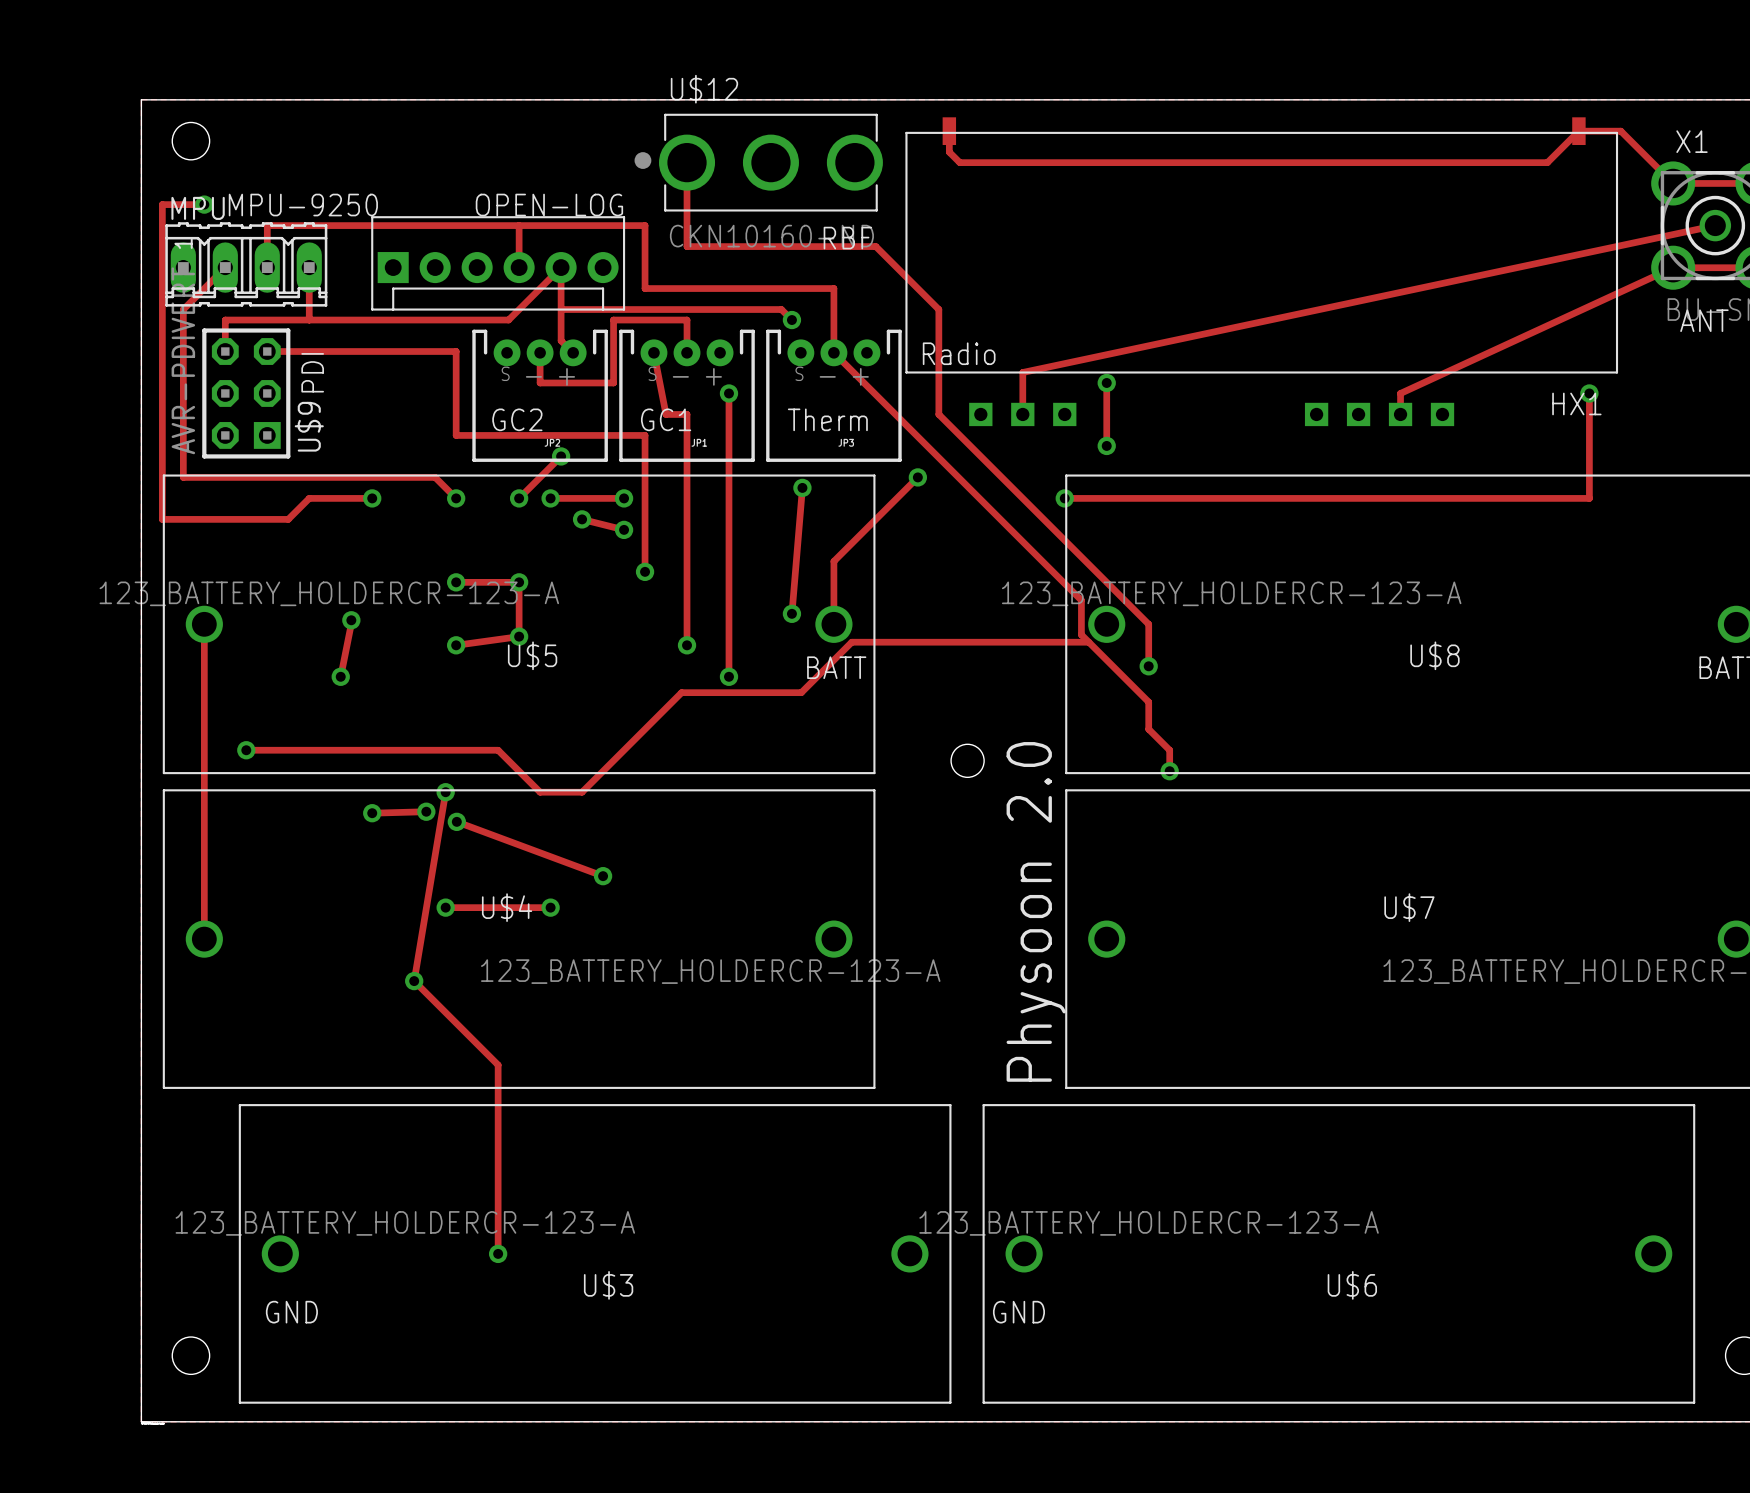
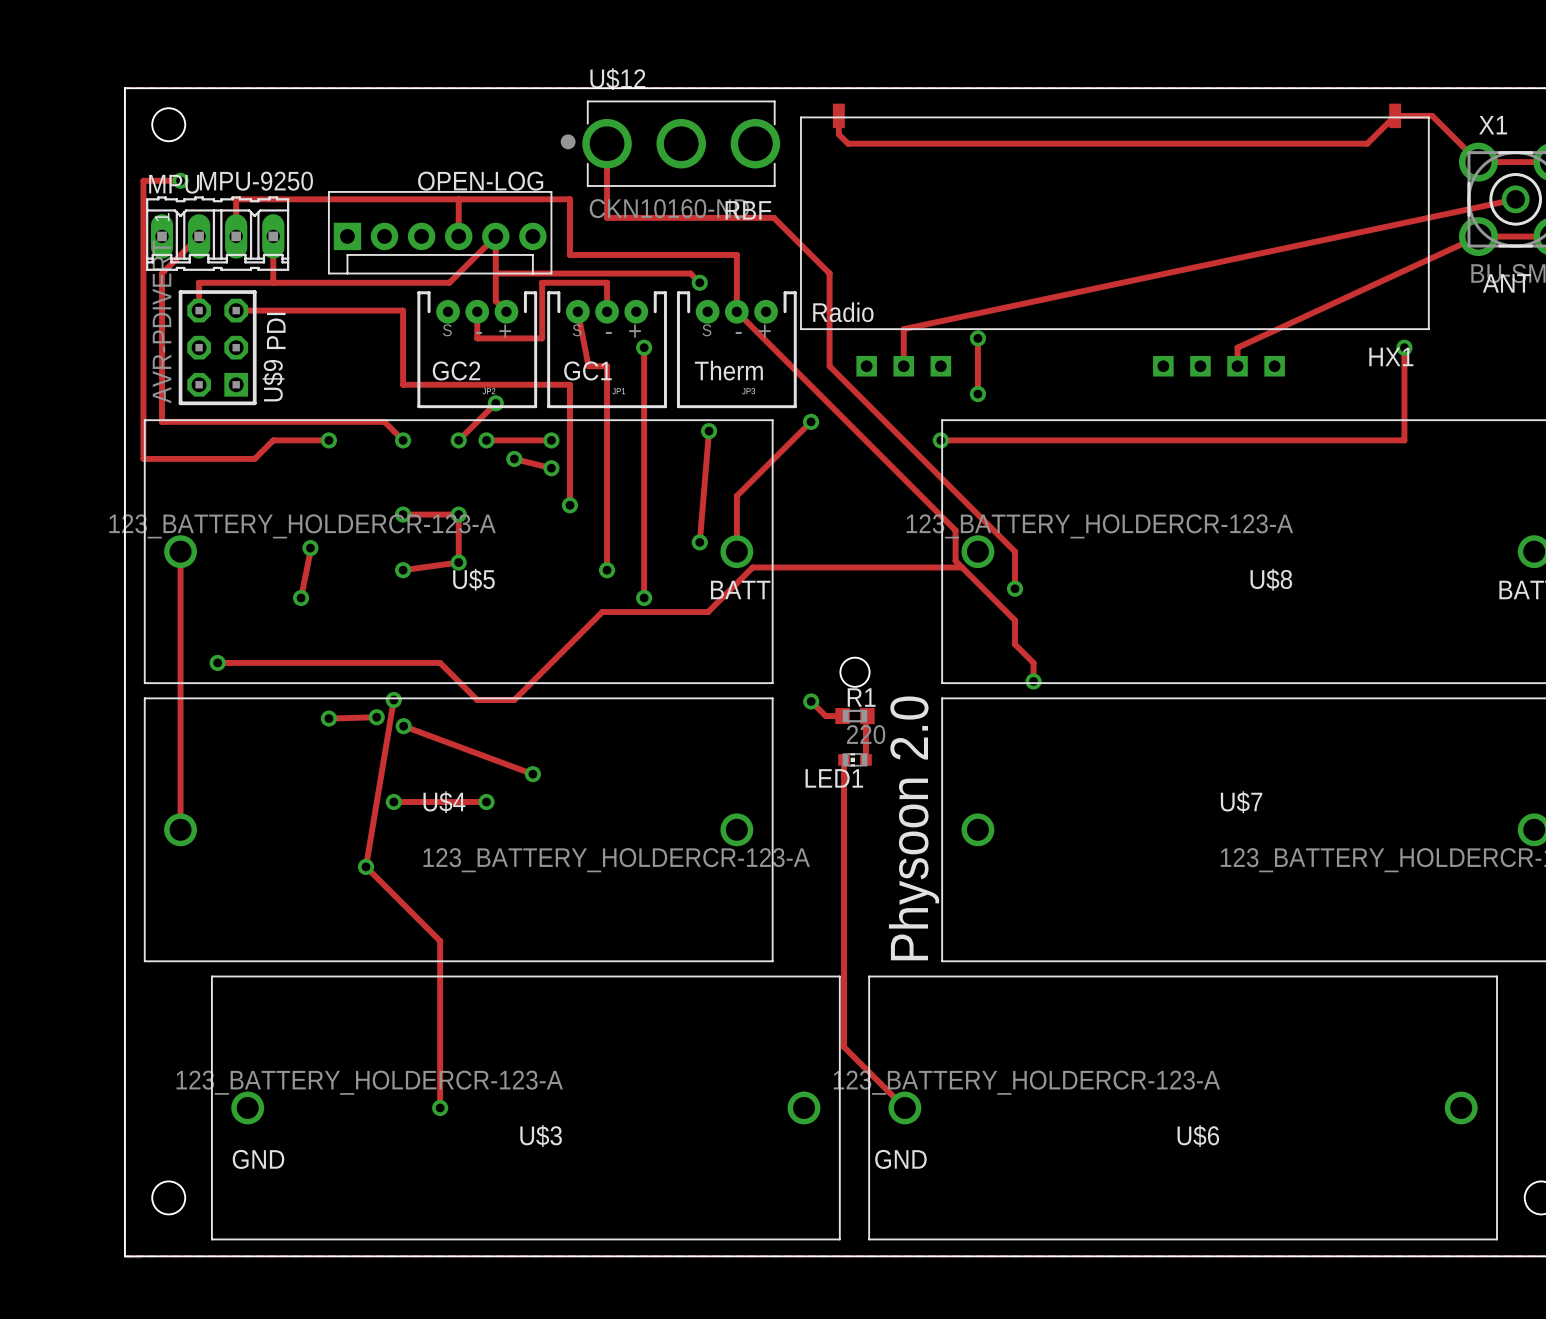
track: none -> (811, 701) (825, 716) (842, 716)
via: none -> (811, 701)
R1: none -> 220 (854, 716)
track: none -> (867, 716) (865, 759)
track: none -> (844, 759) (844, 1047) (904, 1107)
LED1: none -> (854, 759)

